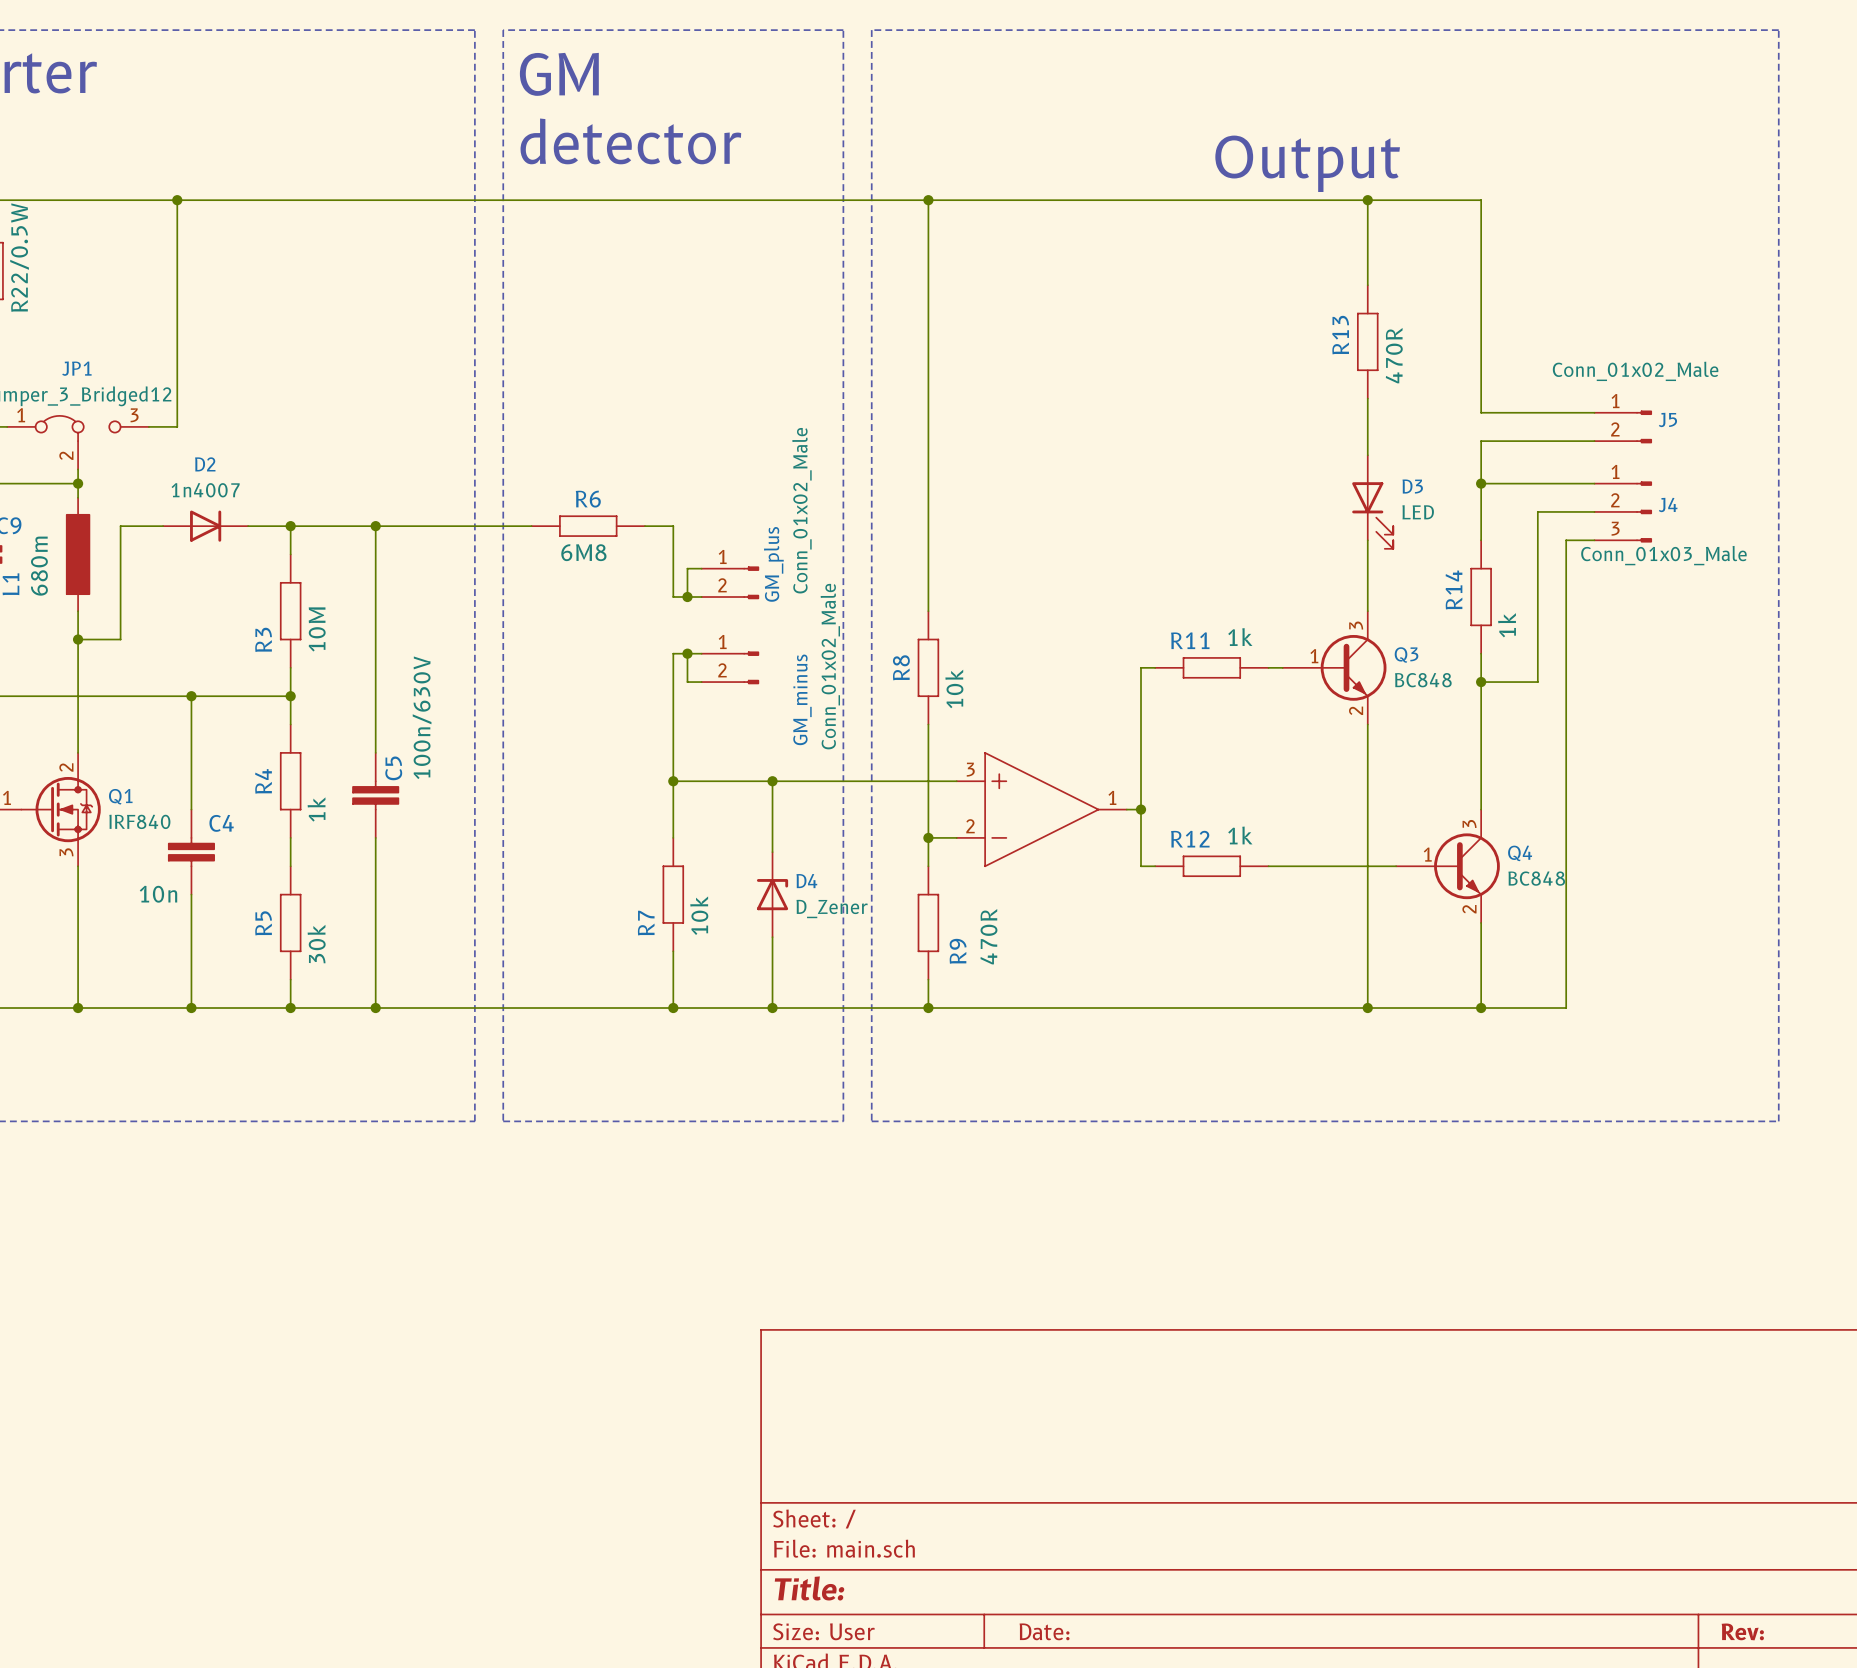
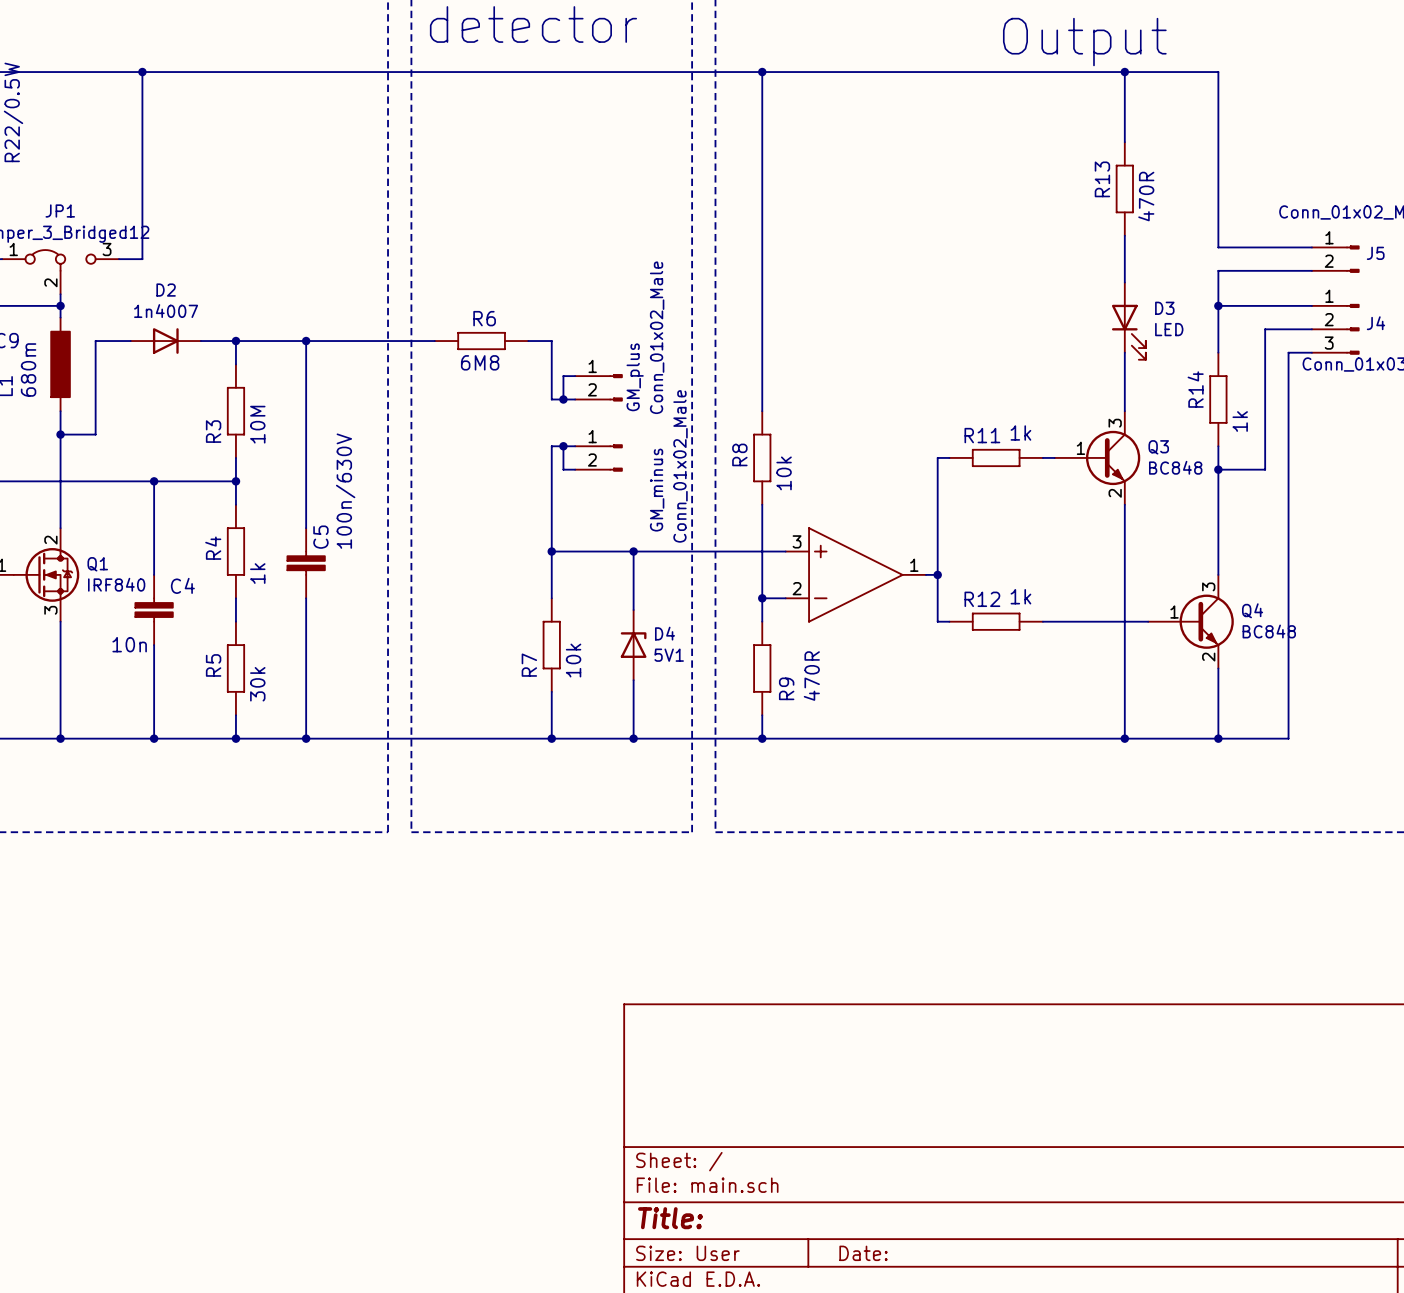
D4 value: D_Zener (832, 909) -> 5V1 (669, 655)

